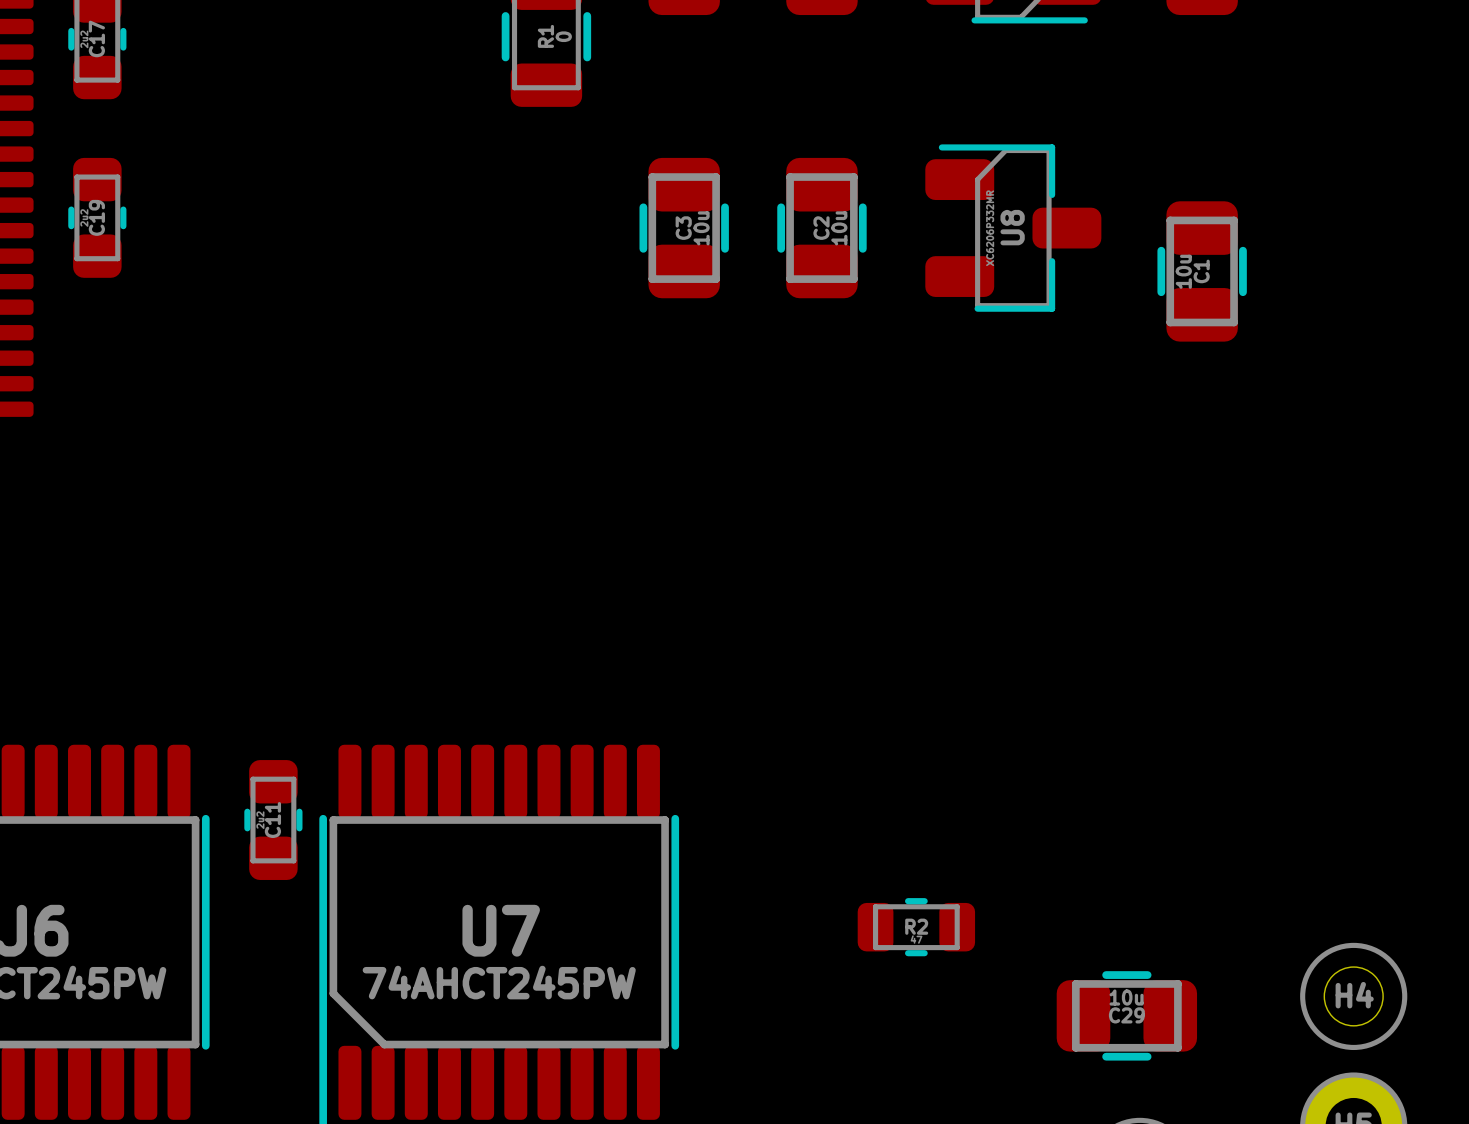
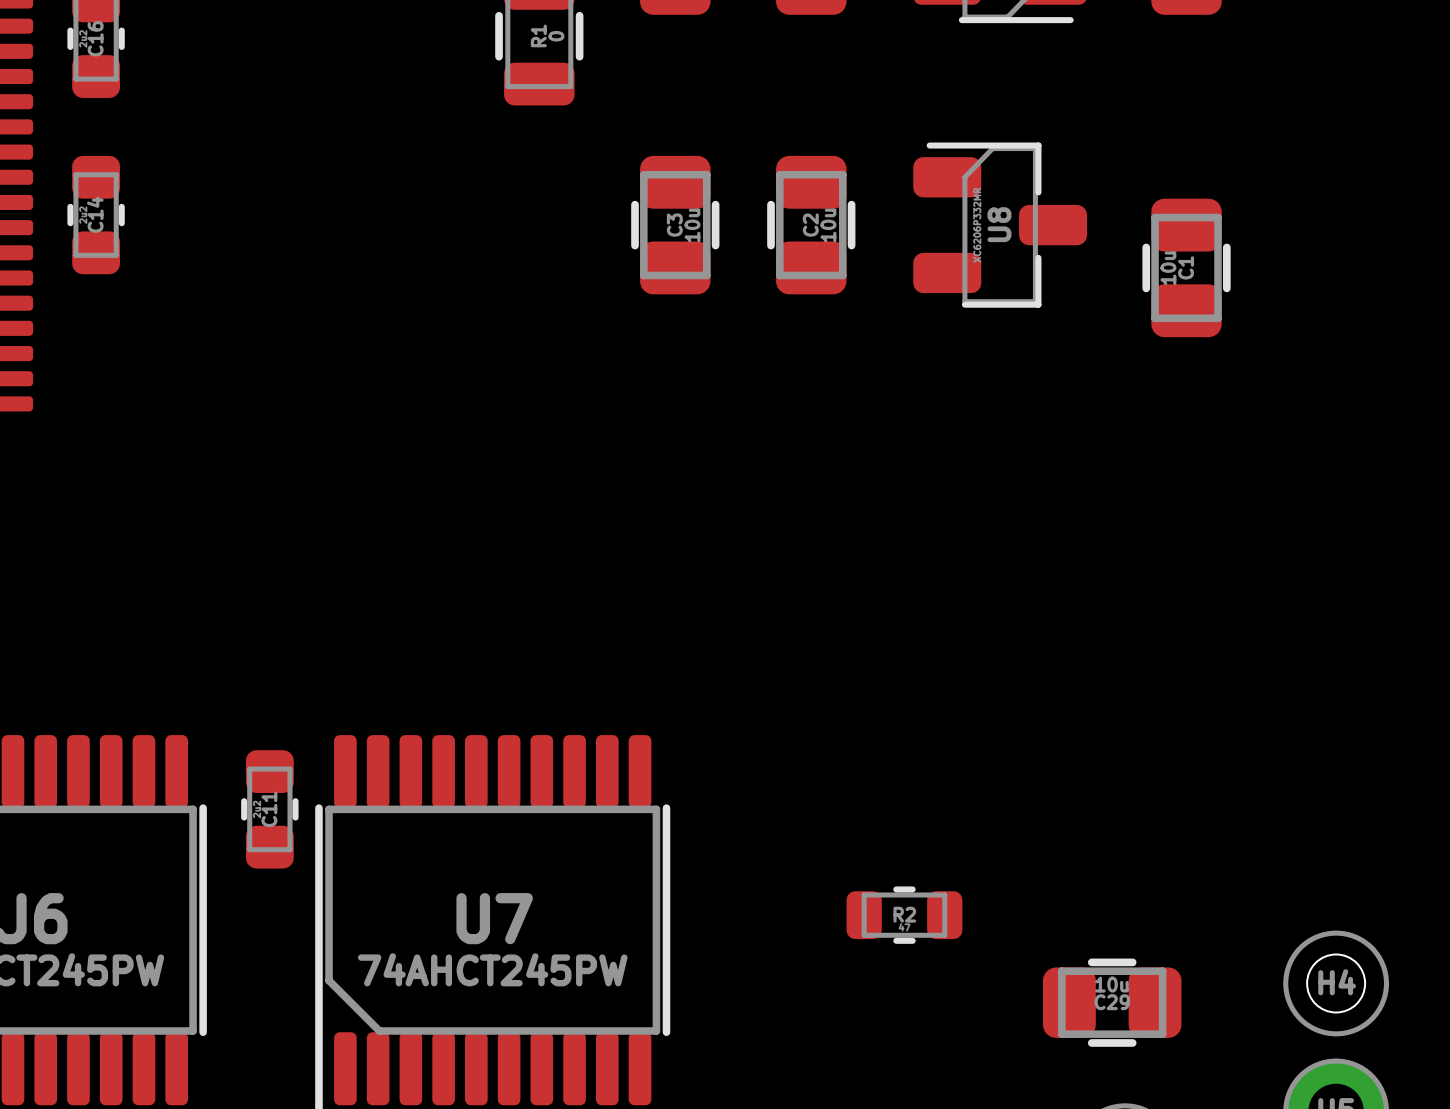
C17 name: C17 (96, 38) -> C16 (95, 38)
C19 name: C19 (96, 217) -> C14 (95, 214)

